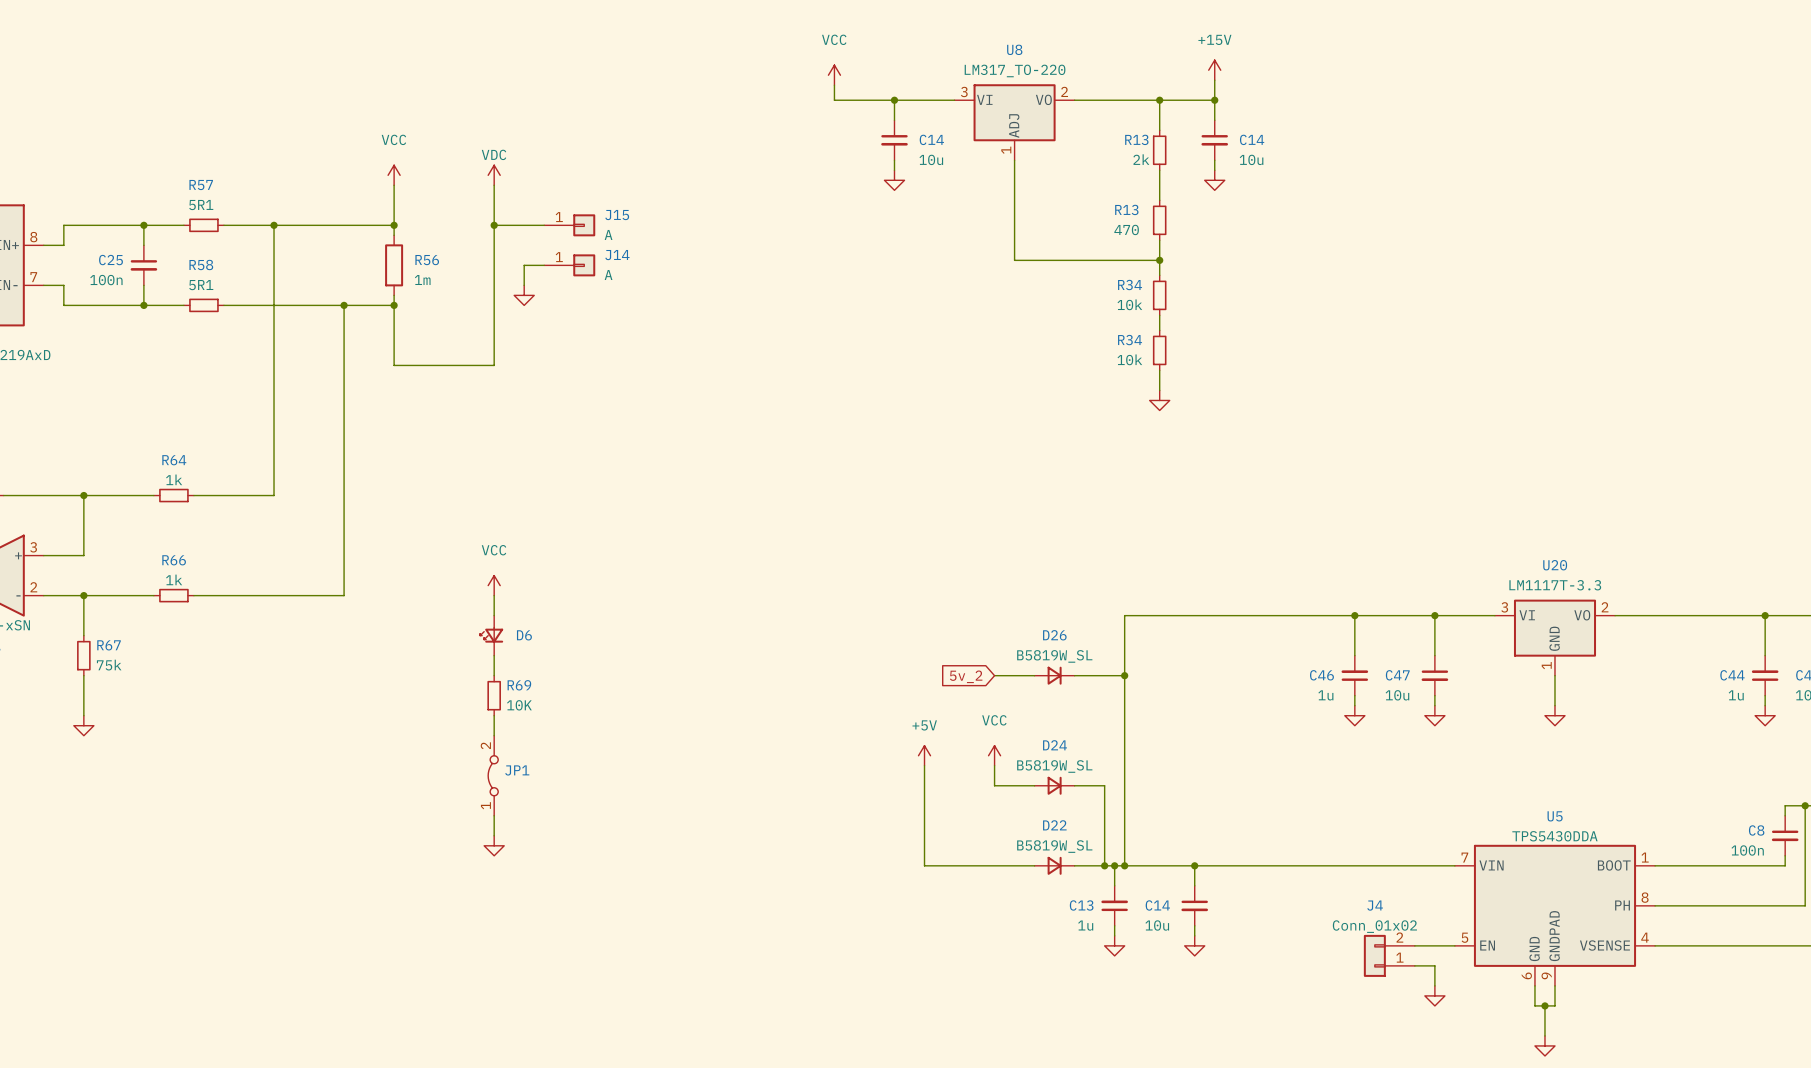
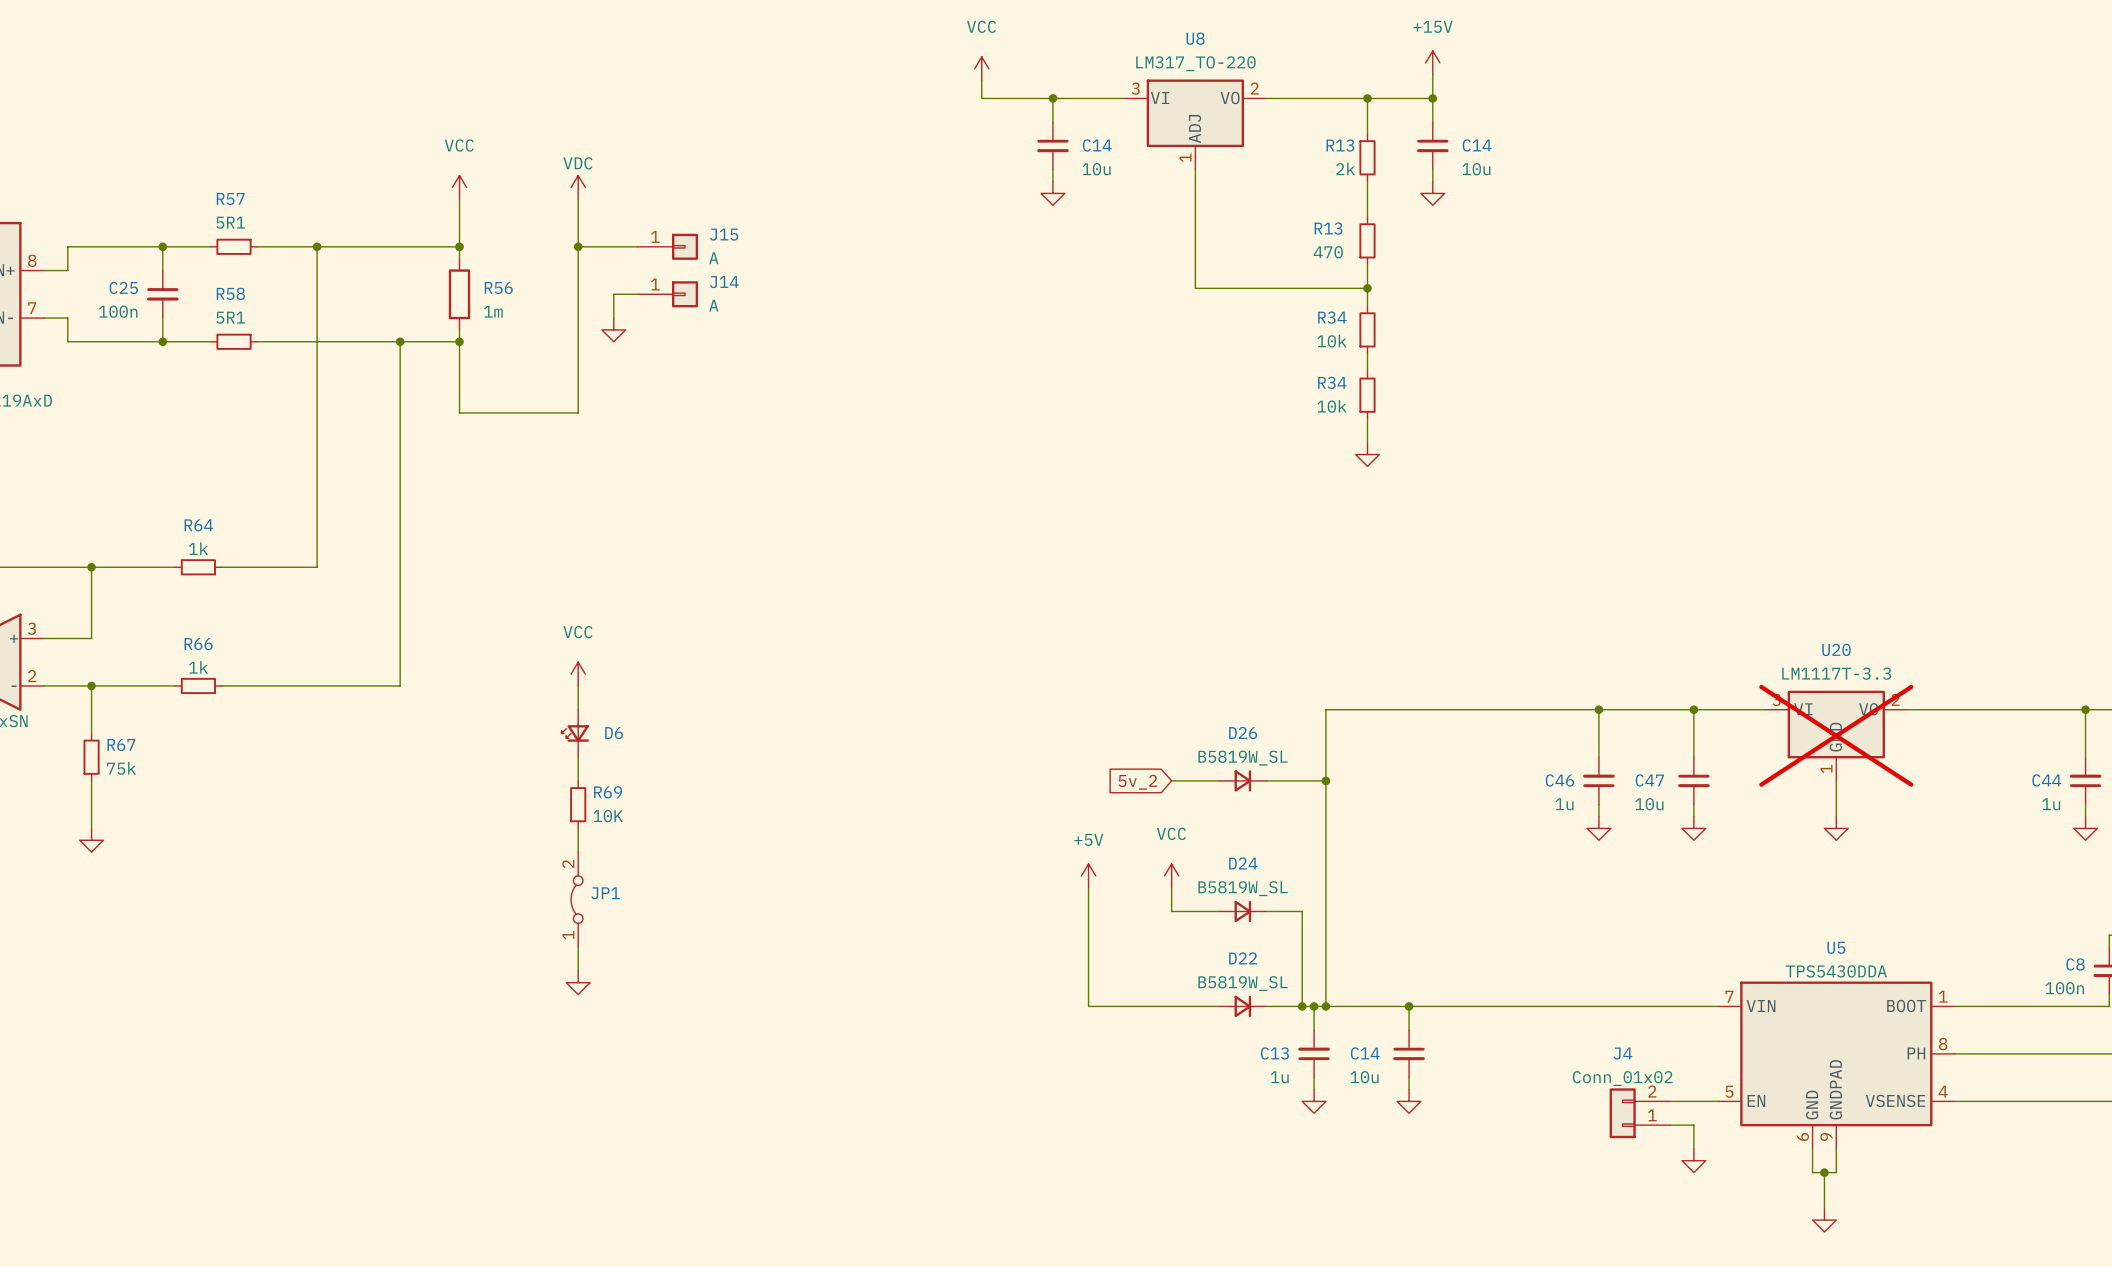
U20 do-not-place cross: none -> (1836, 735)

